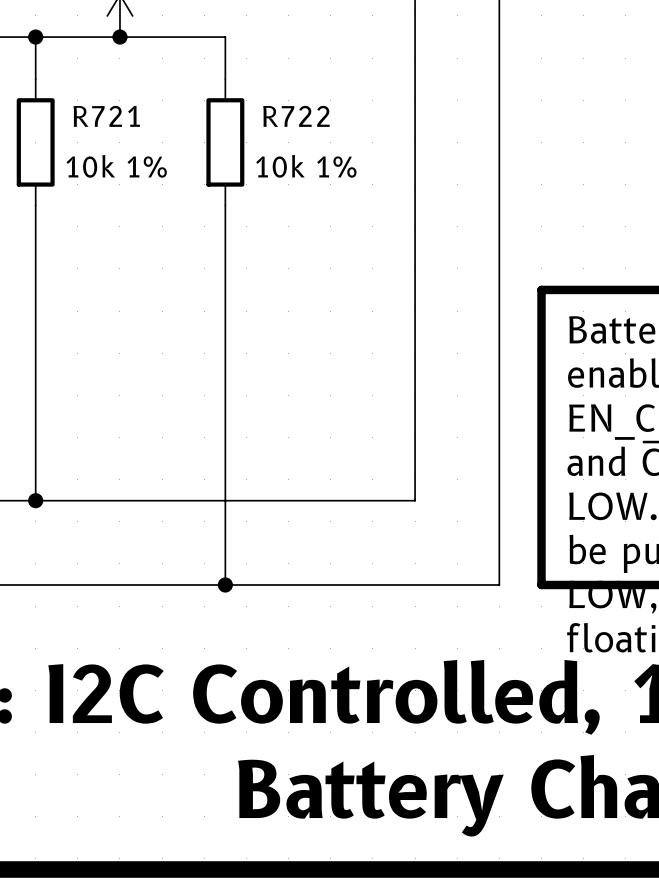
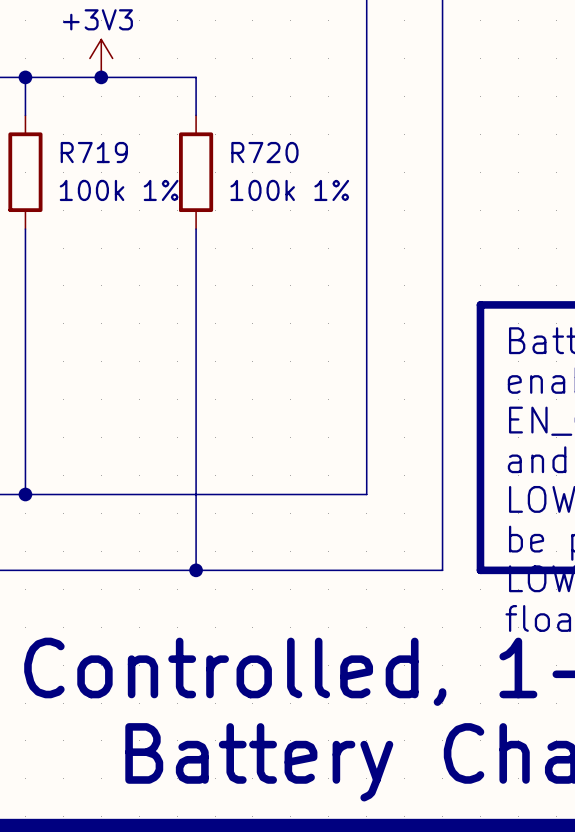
R721 name: R721 (106, 116) -> R719 (94, 152)
R722 name: R722 (296, 116) -> R720 (264, 152)
R721 value: 10k 1% (116, 166) -> 100k 1% (119, 190)
R722 value: 10k 1% (306, 166) -> 100k 1% (289, 190)

